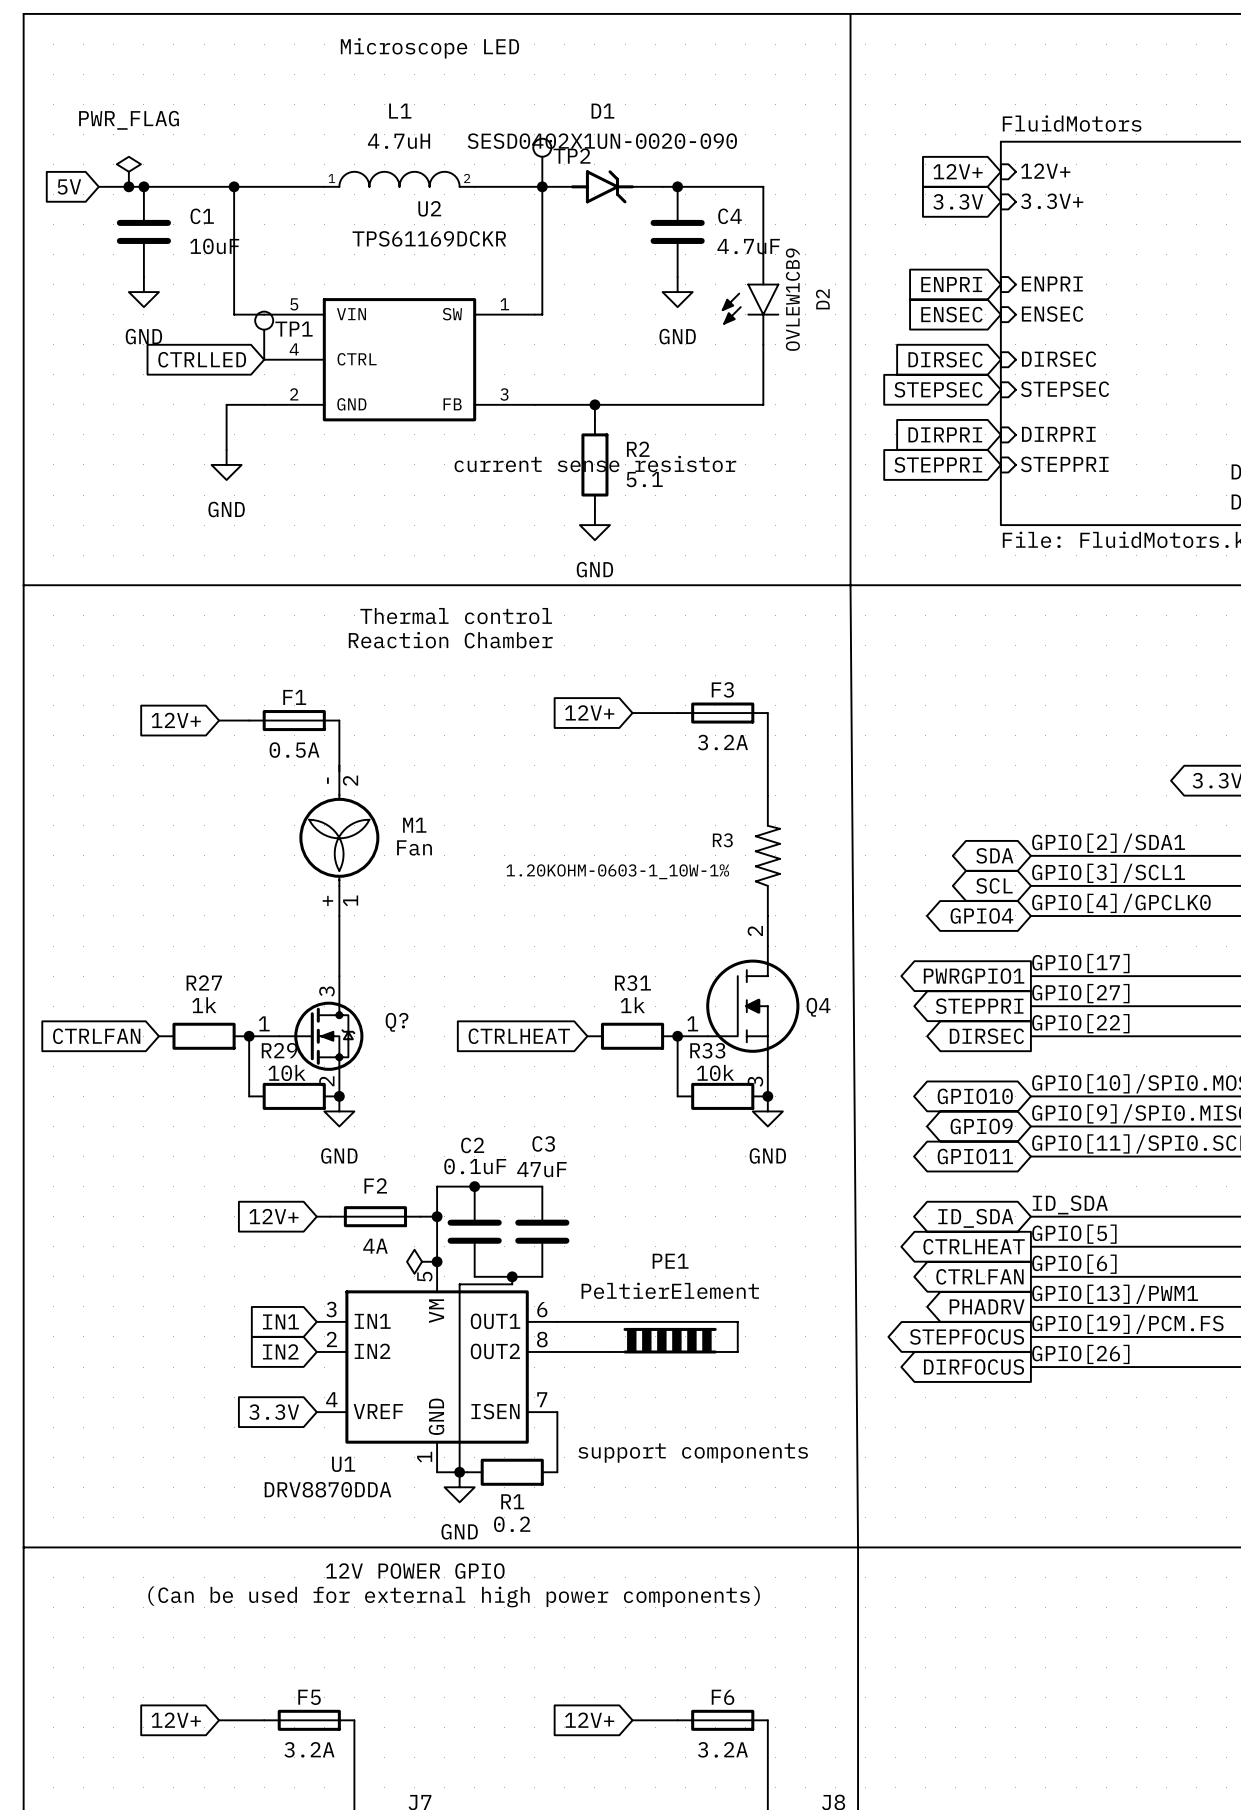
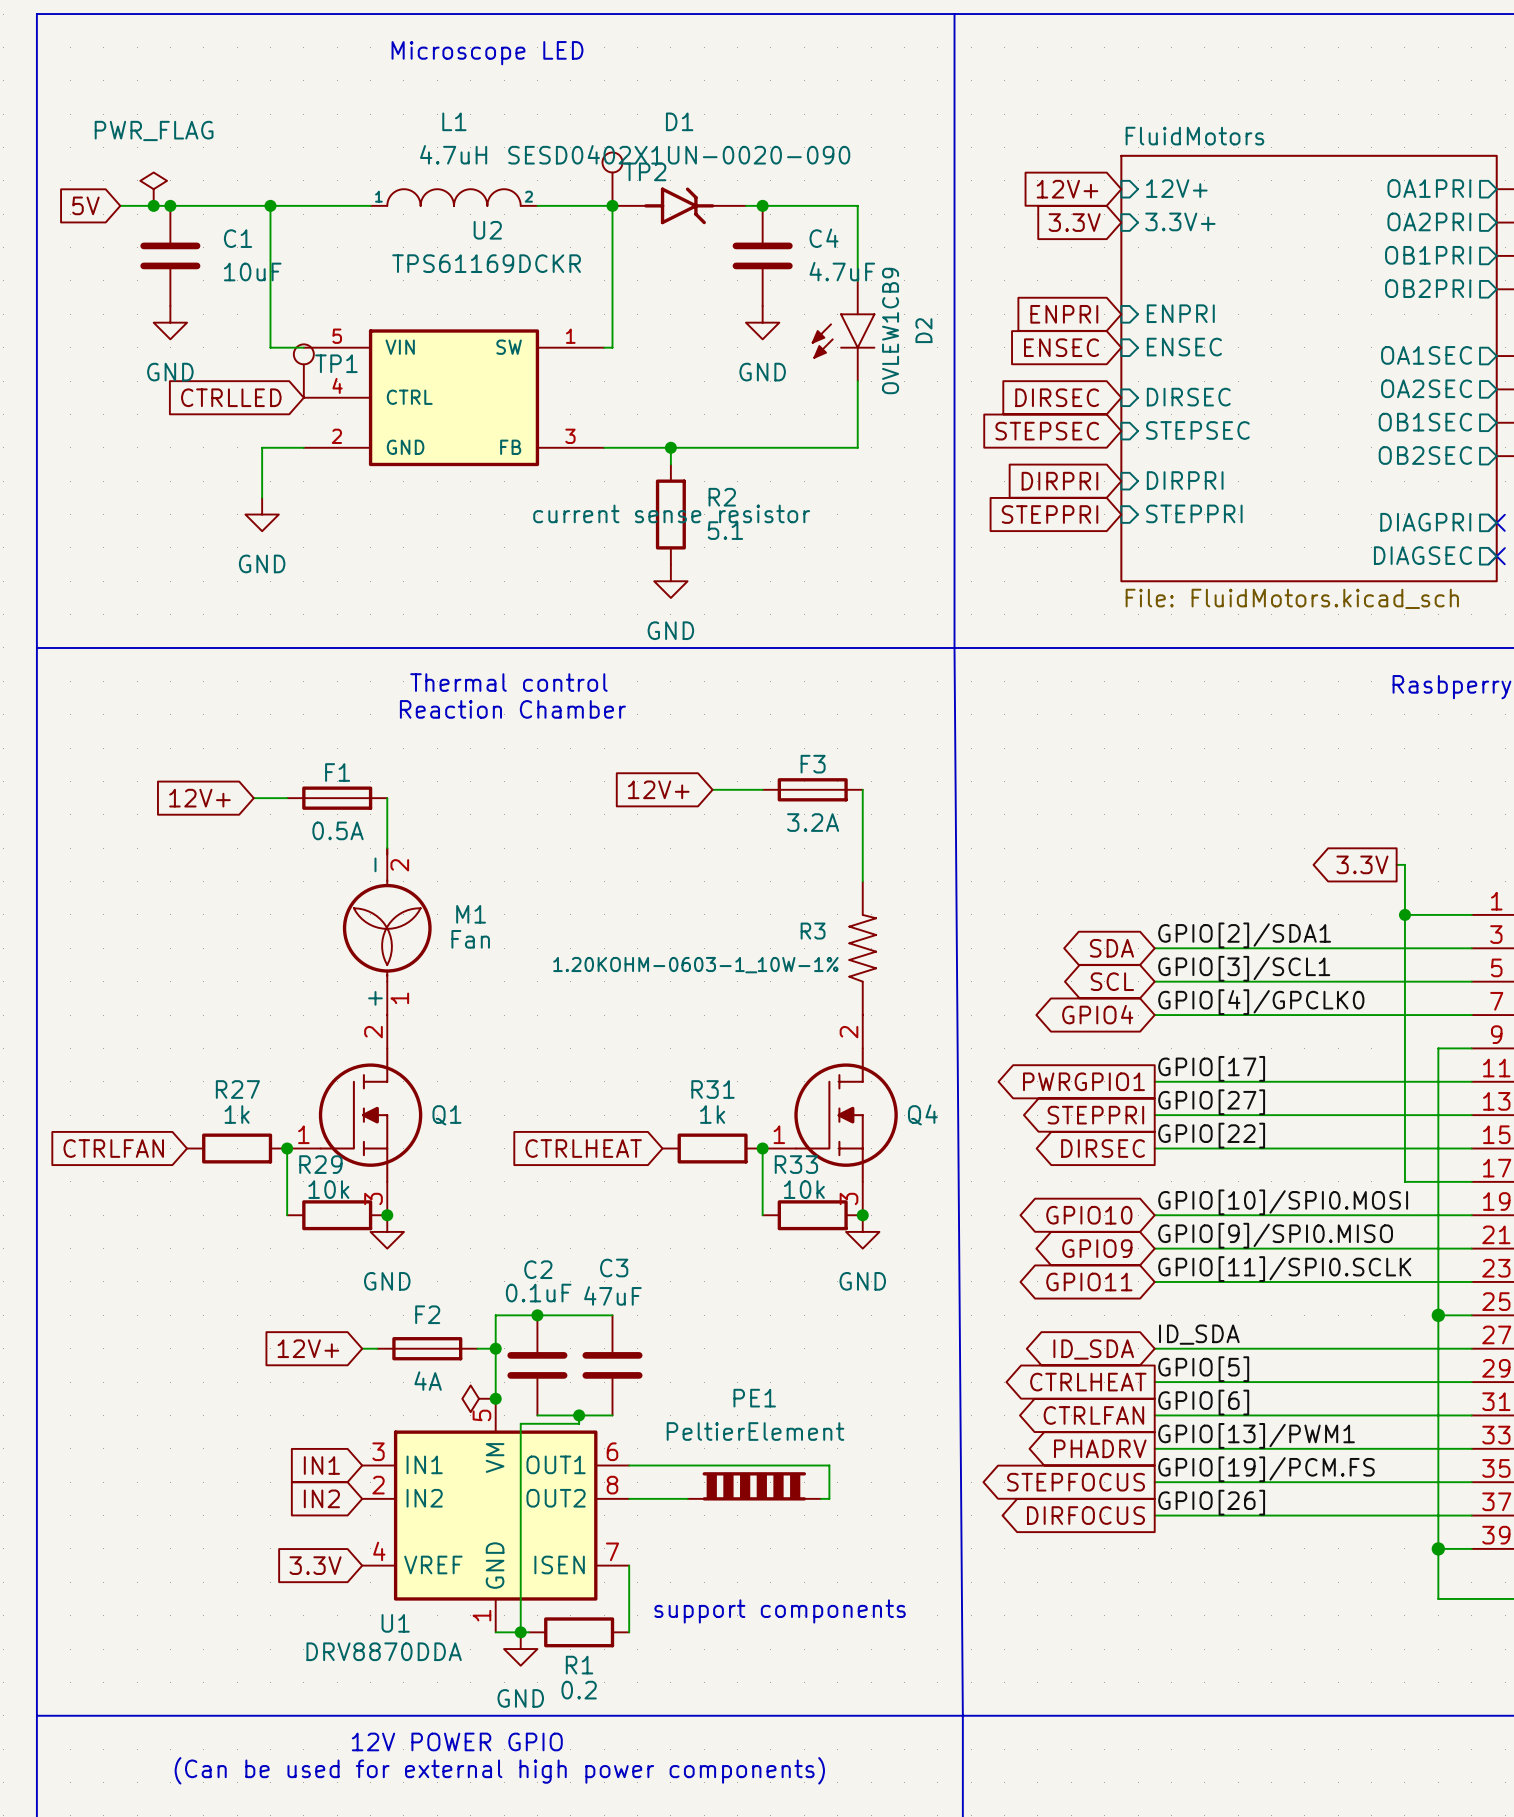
Q1: none -> (354, 1115)
Q?: (306, 1036) -> none

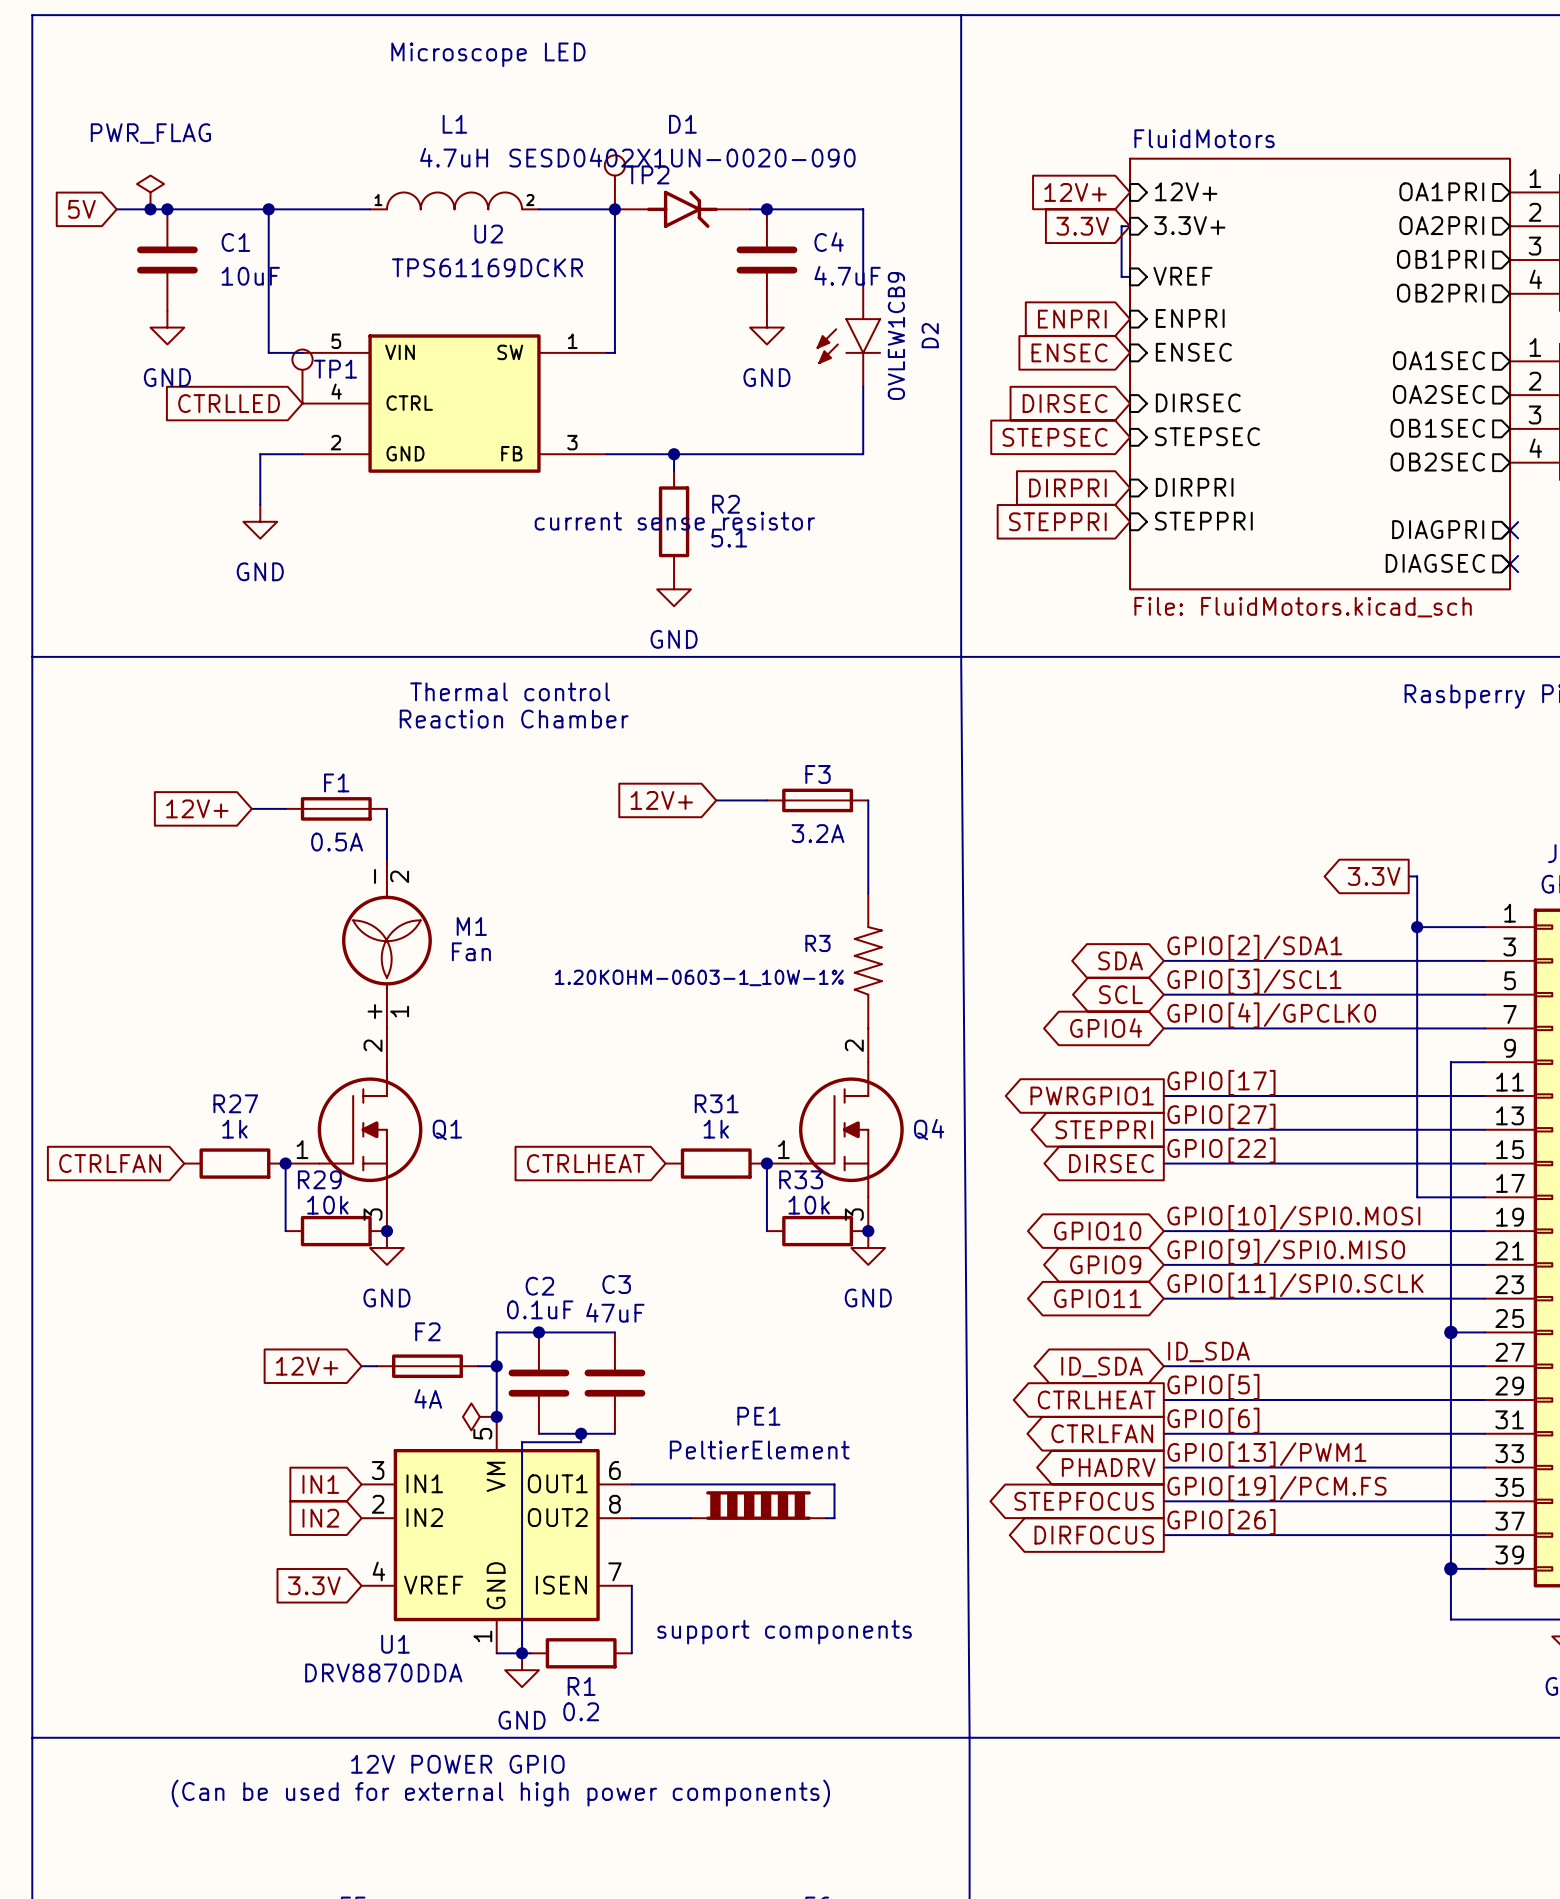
wire: none -> (1130, 226) (1121, 226) (1121, 276) (1130, 276)
sheet pin: none -> VREF (1182, 276)

